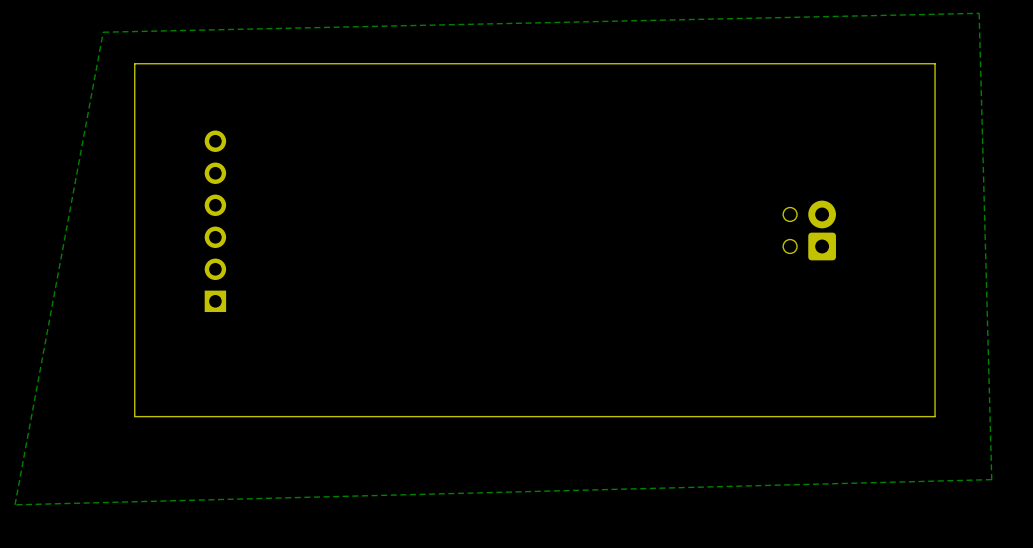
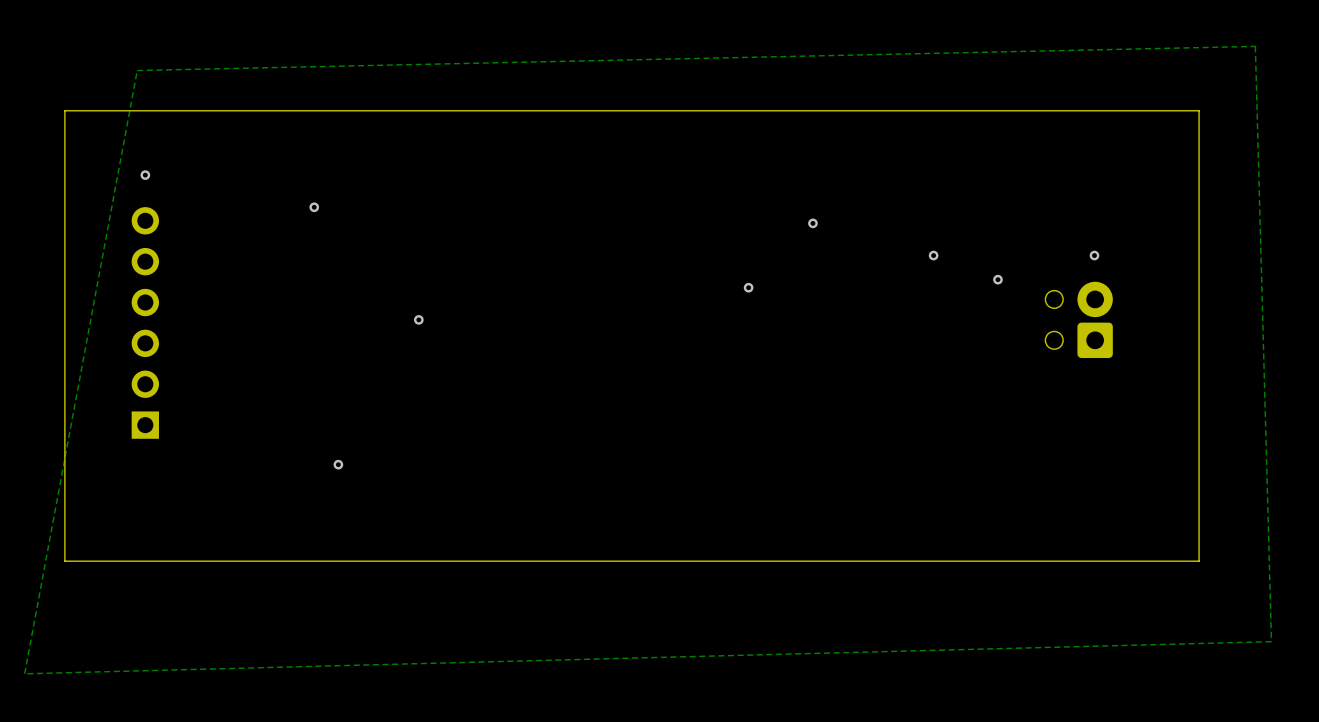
board edge: (134, 63) (134, 416) -> (177, 110) (64, 110) (64, 561) (177, 561)
via: none -> (145, 175)
via: none -> (314, 207)
via: none -> (812, 223)
via: none -> (933, 255)
via: none -> (1094, 255)
via: none -> (997, 279)
via: none -> (748, 287)
part position: (215, 221) -> (145, 322)
via: none -> (418, 319)
part position: (809, 230) -> (1079, 319)
via: none -> (338, 464)

